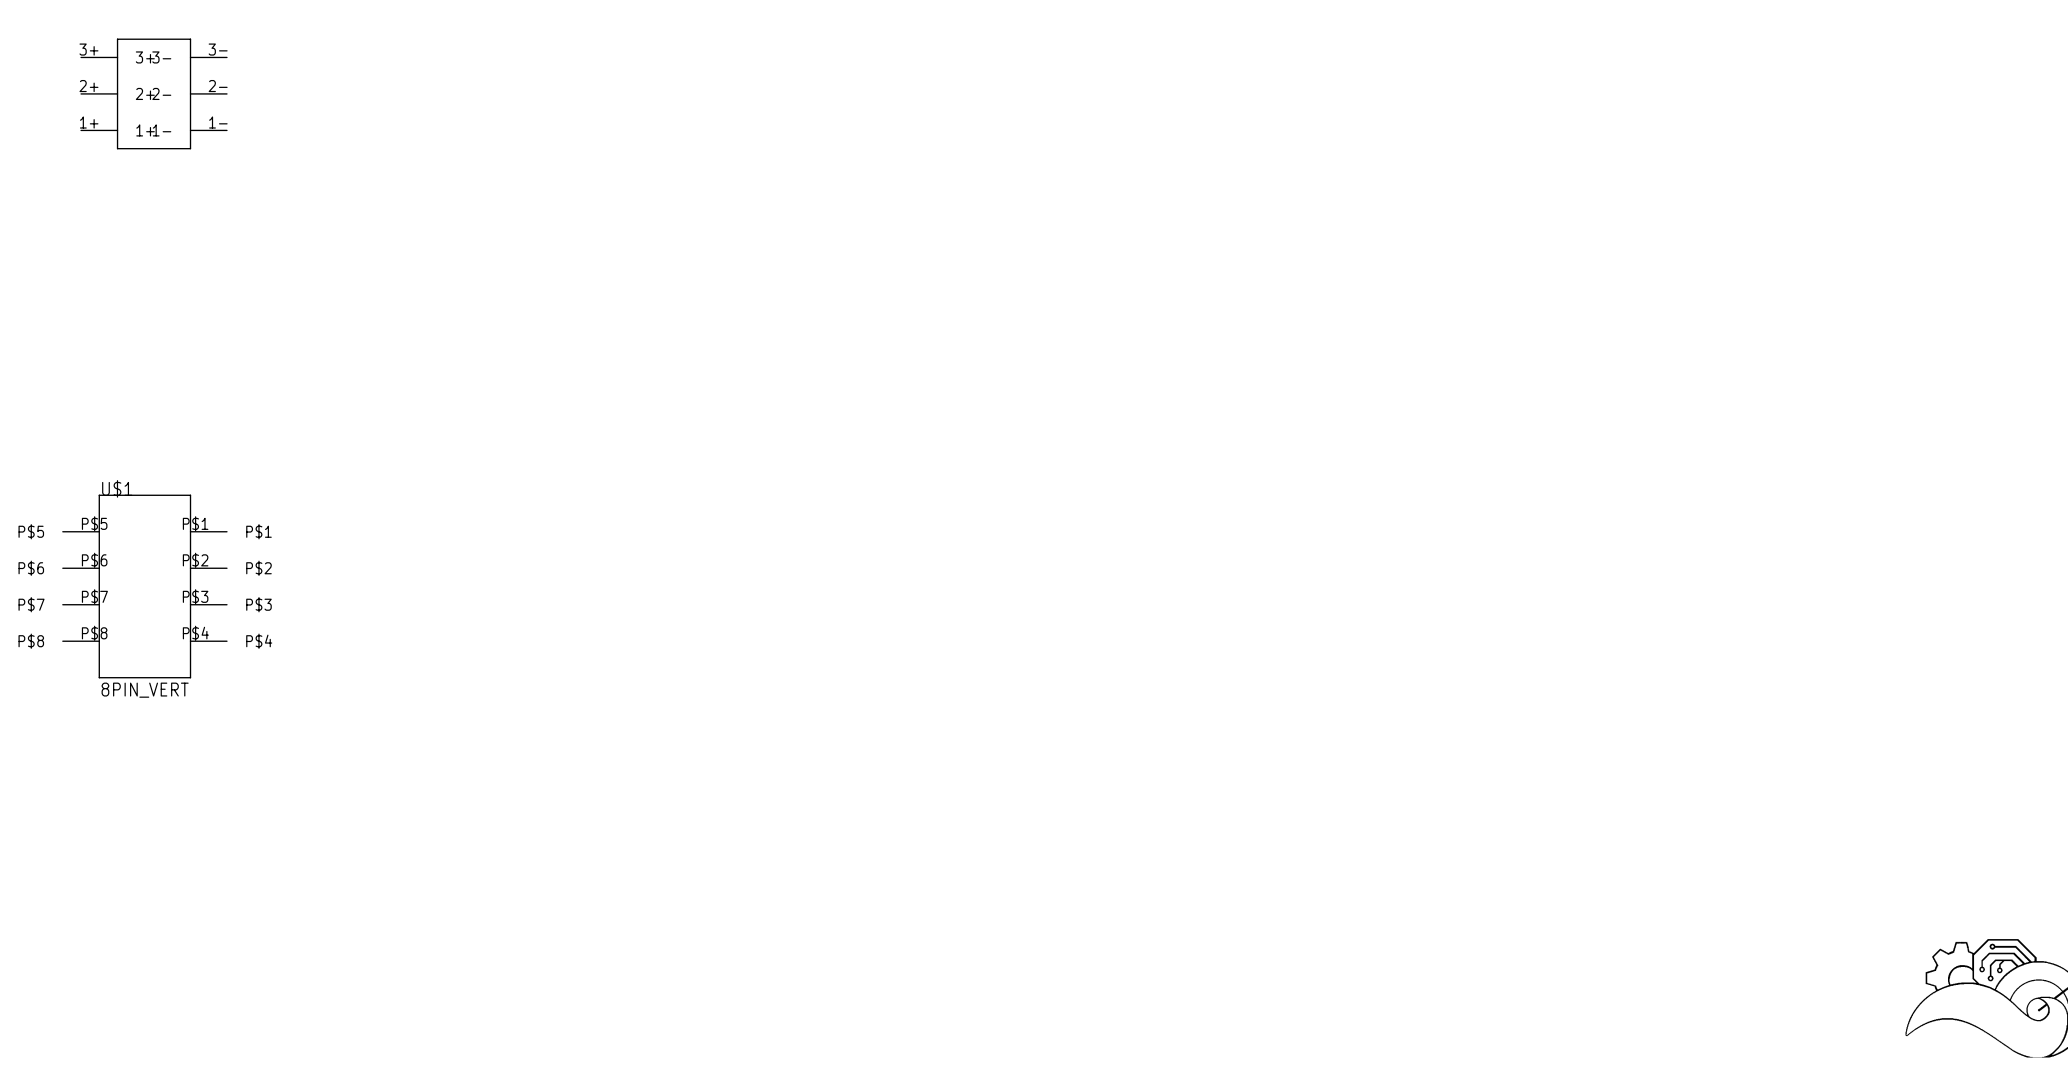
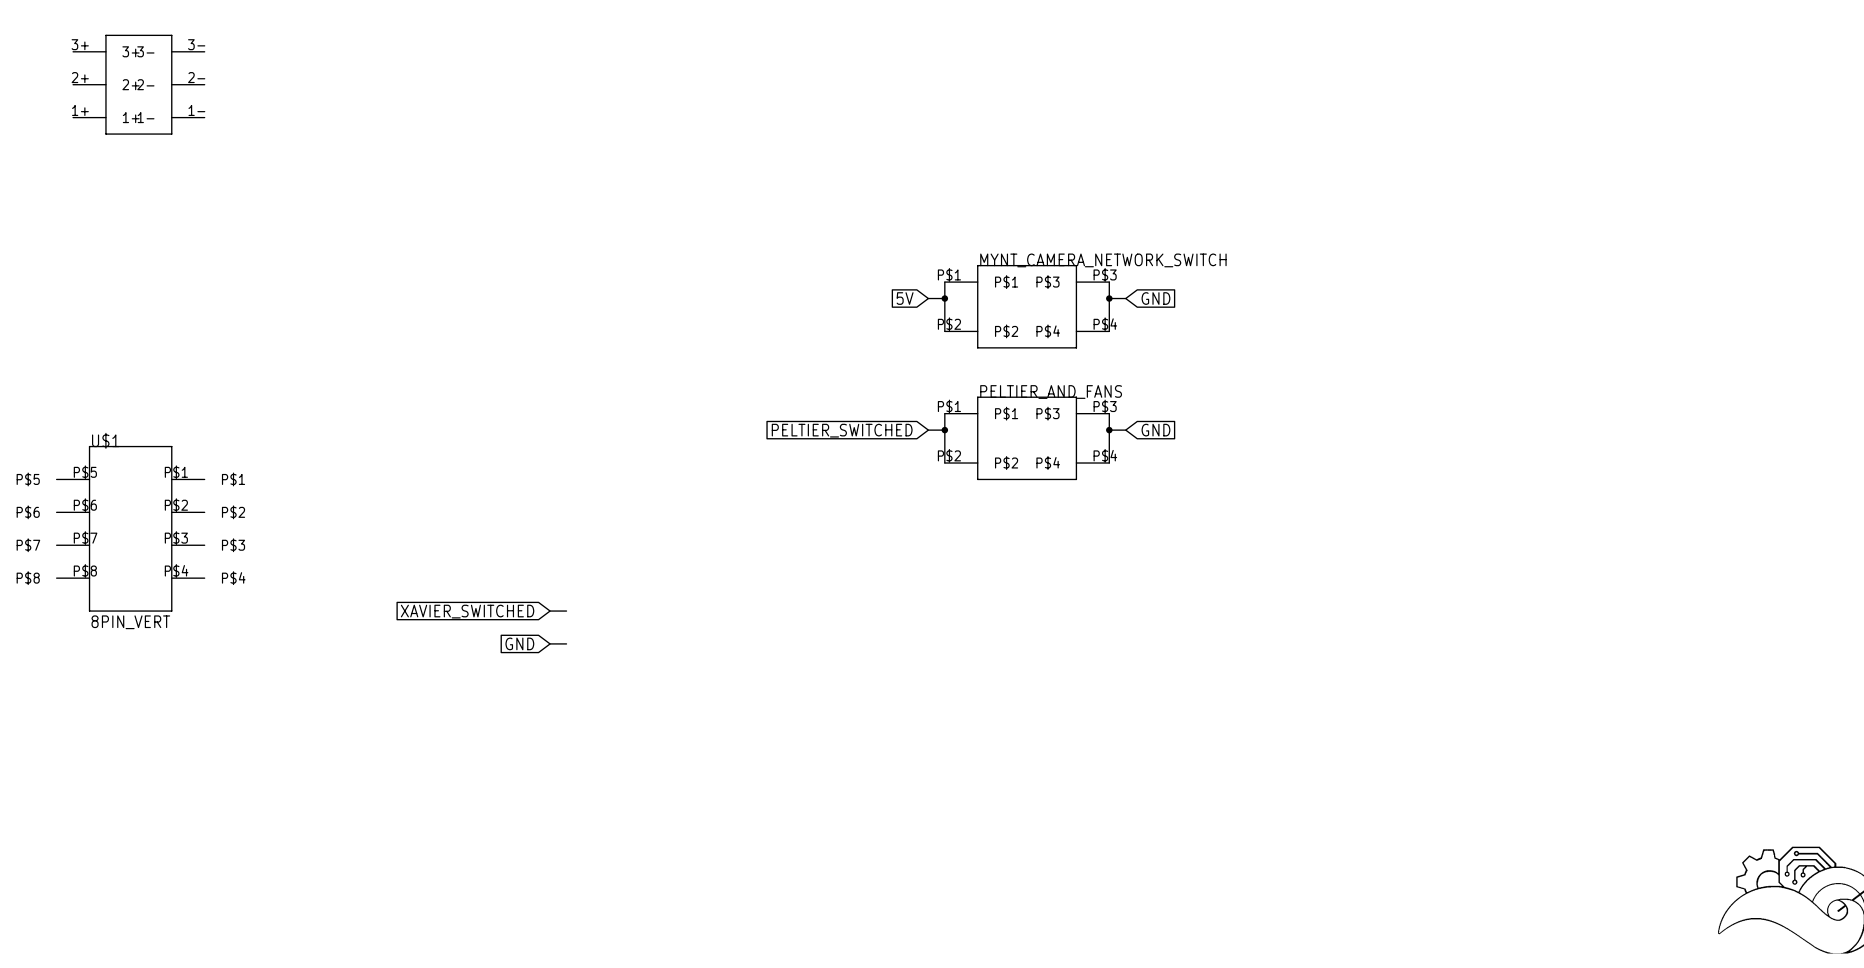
wire: none -> (944, 282) (944, 331)
wire: none -> (1109, 282) (1109, 331)
global label: none -> 5V (905, 298)
wire: none -> (928, 298) (944, 298)
junction: none -> (944, 298)
wire: none -> (1109, 298) (1125, 298)
junction: none -> (1109, 298)
global label: none -> GND (1155, 298)
MYNT_CAMERA_NETWORK_SWITCH: none -> (1027, 306)
wire: none -> (944, 413) (944, 463)
wire: none -> (1109, 413) (1109, 463)
global label: none -> PELTIER_SWITCHED (842, 430)
wire: none -> (928, 430) (944, 430)
junction: none -> (944, 430)
wire: none -> (1109, 430) (1125, 430)
junction: none -> (1109, 430)
global label: none -> GND (1155, 430)
PELTIER_AND_FANS: none -> (1027, 438)
wire: none -> (550, 611) (566, 611)
global label: none -> XAVIER_SWITCHED (467, 611)
global label: none -> GND (519, 643)
wire: none -> (550, 643) (566, 643)

